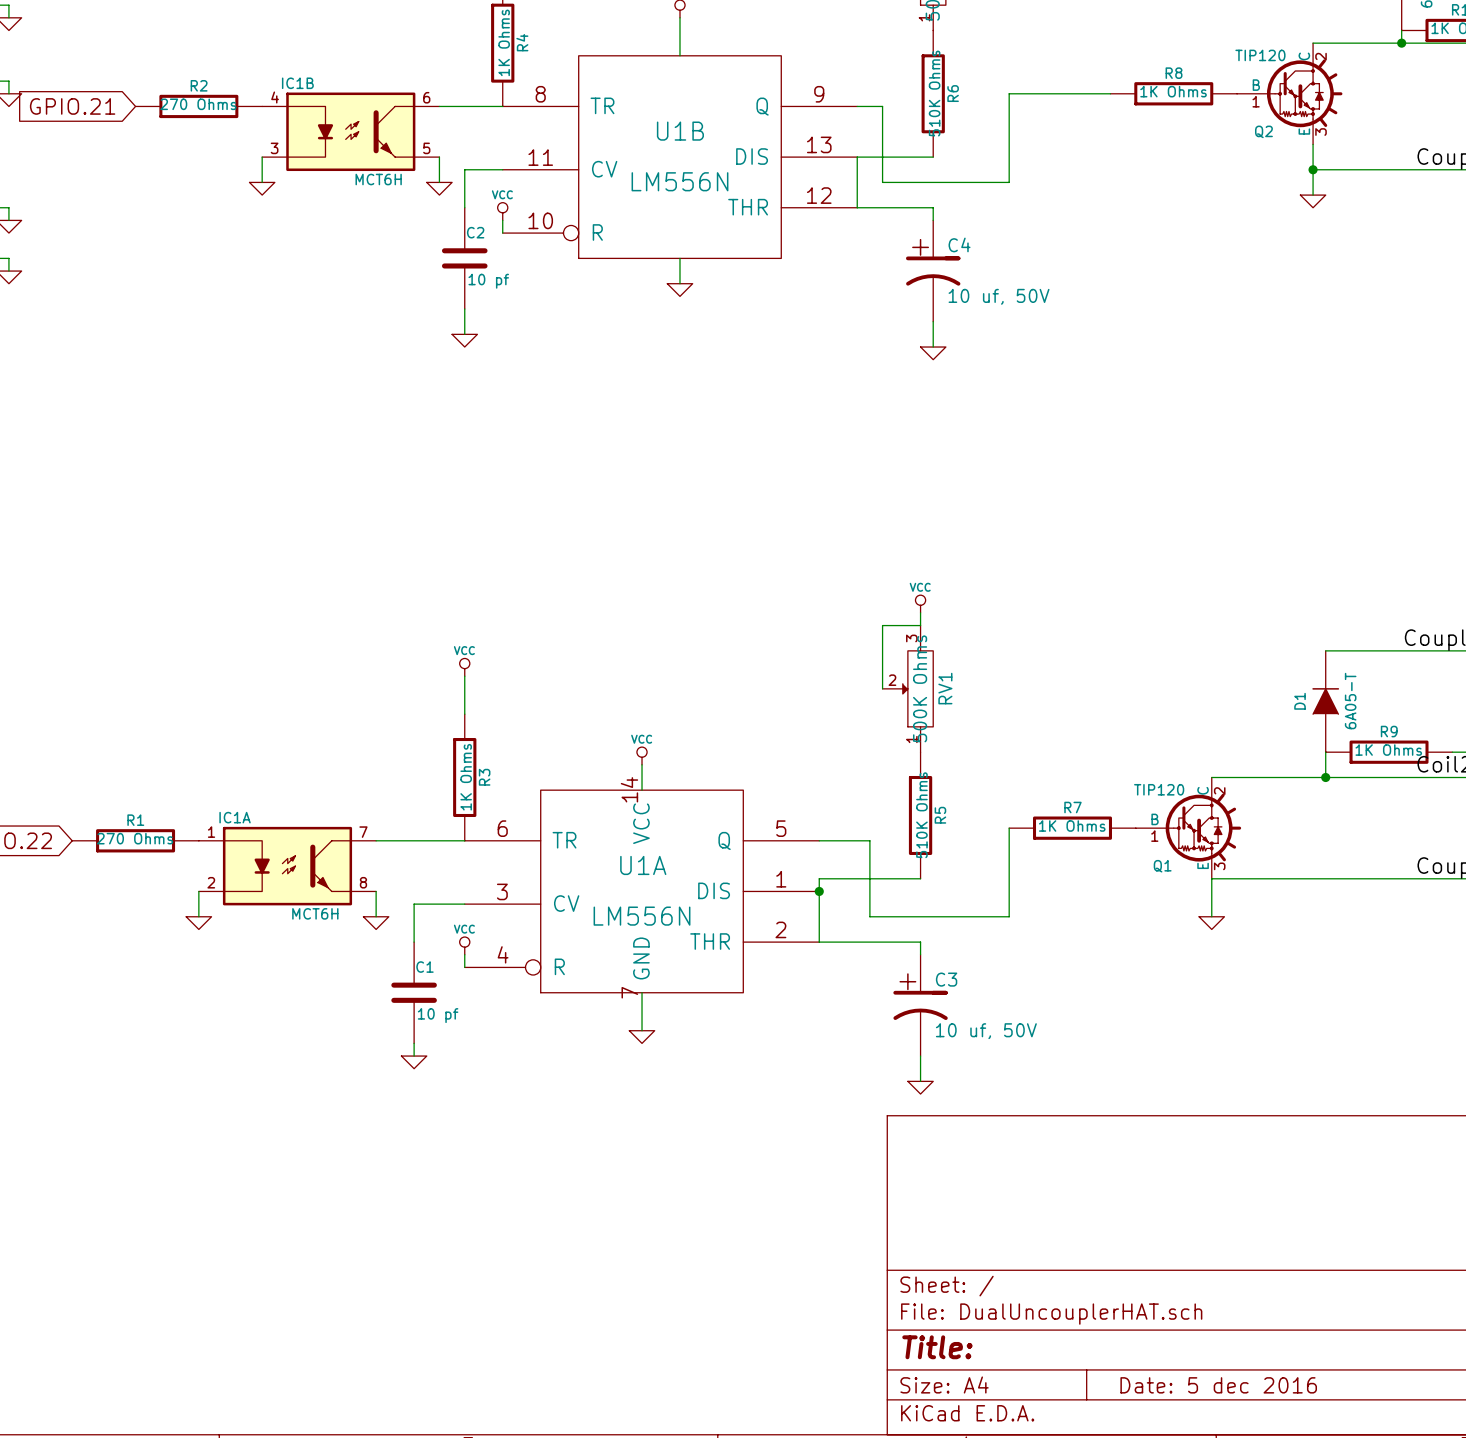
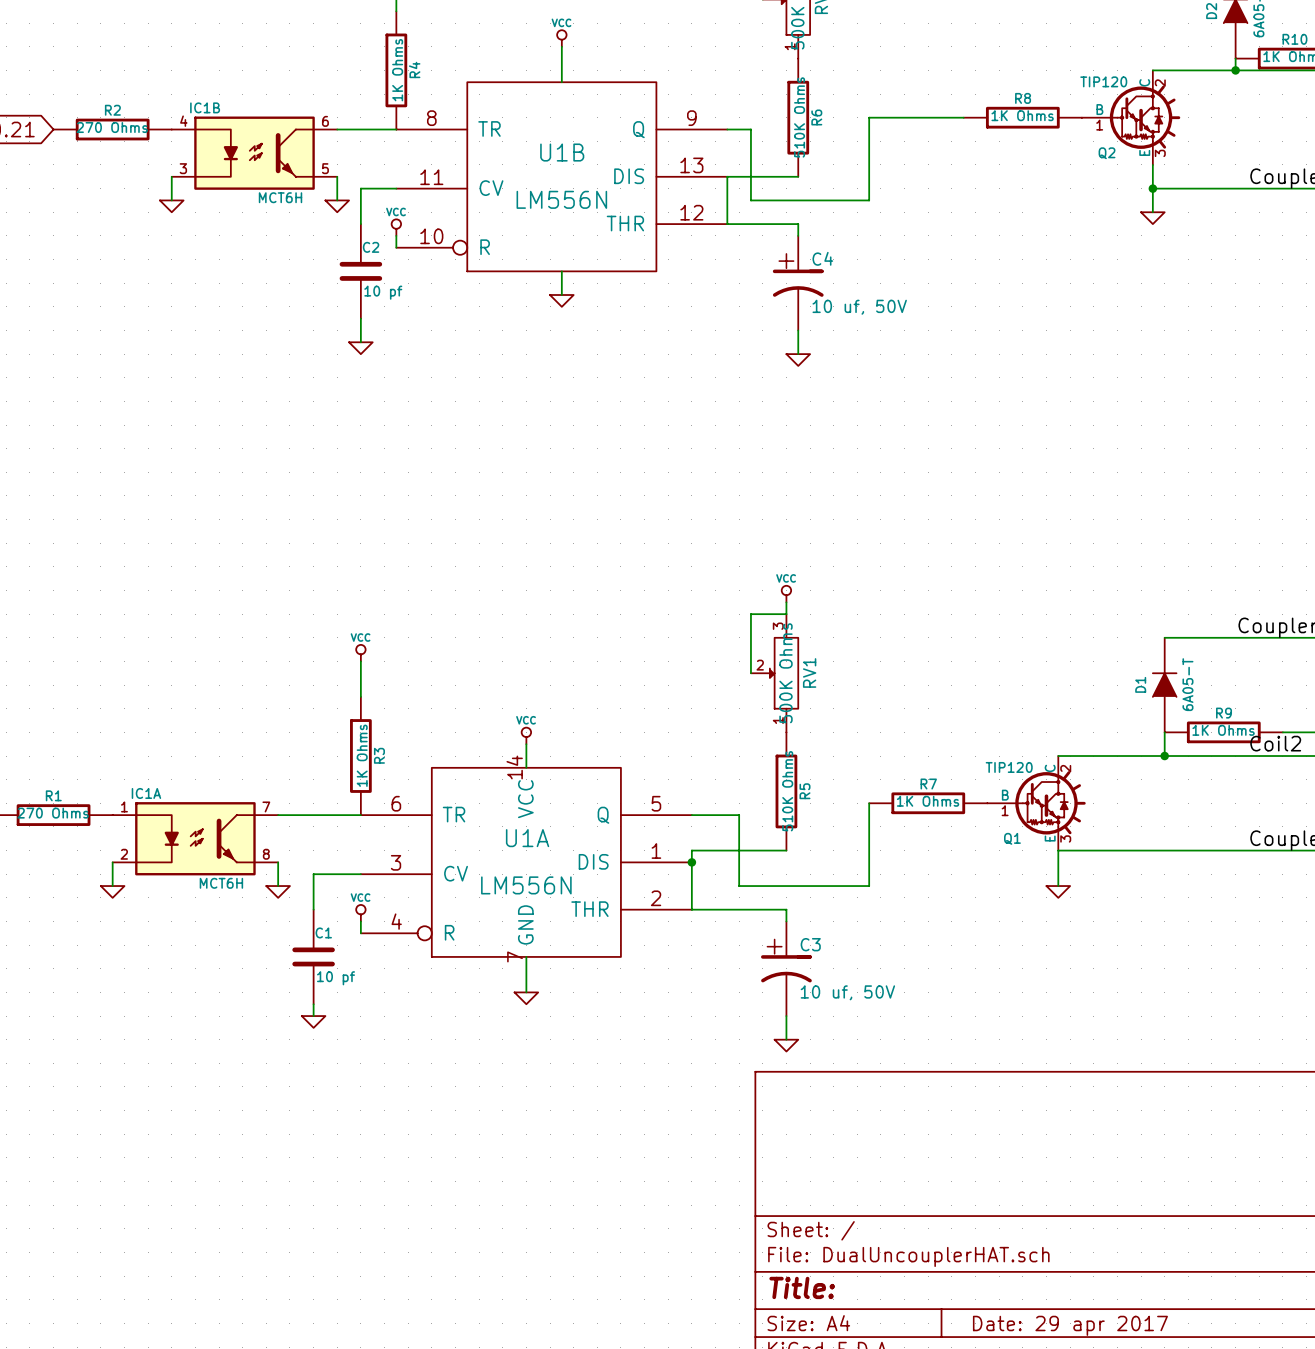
title block: Date: 5 dec 2016 (1218, 1385) -> Date: 29 apr 2017 (1070, 1325)

